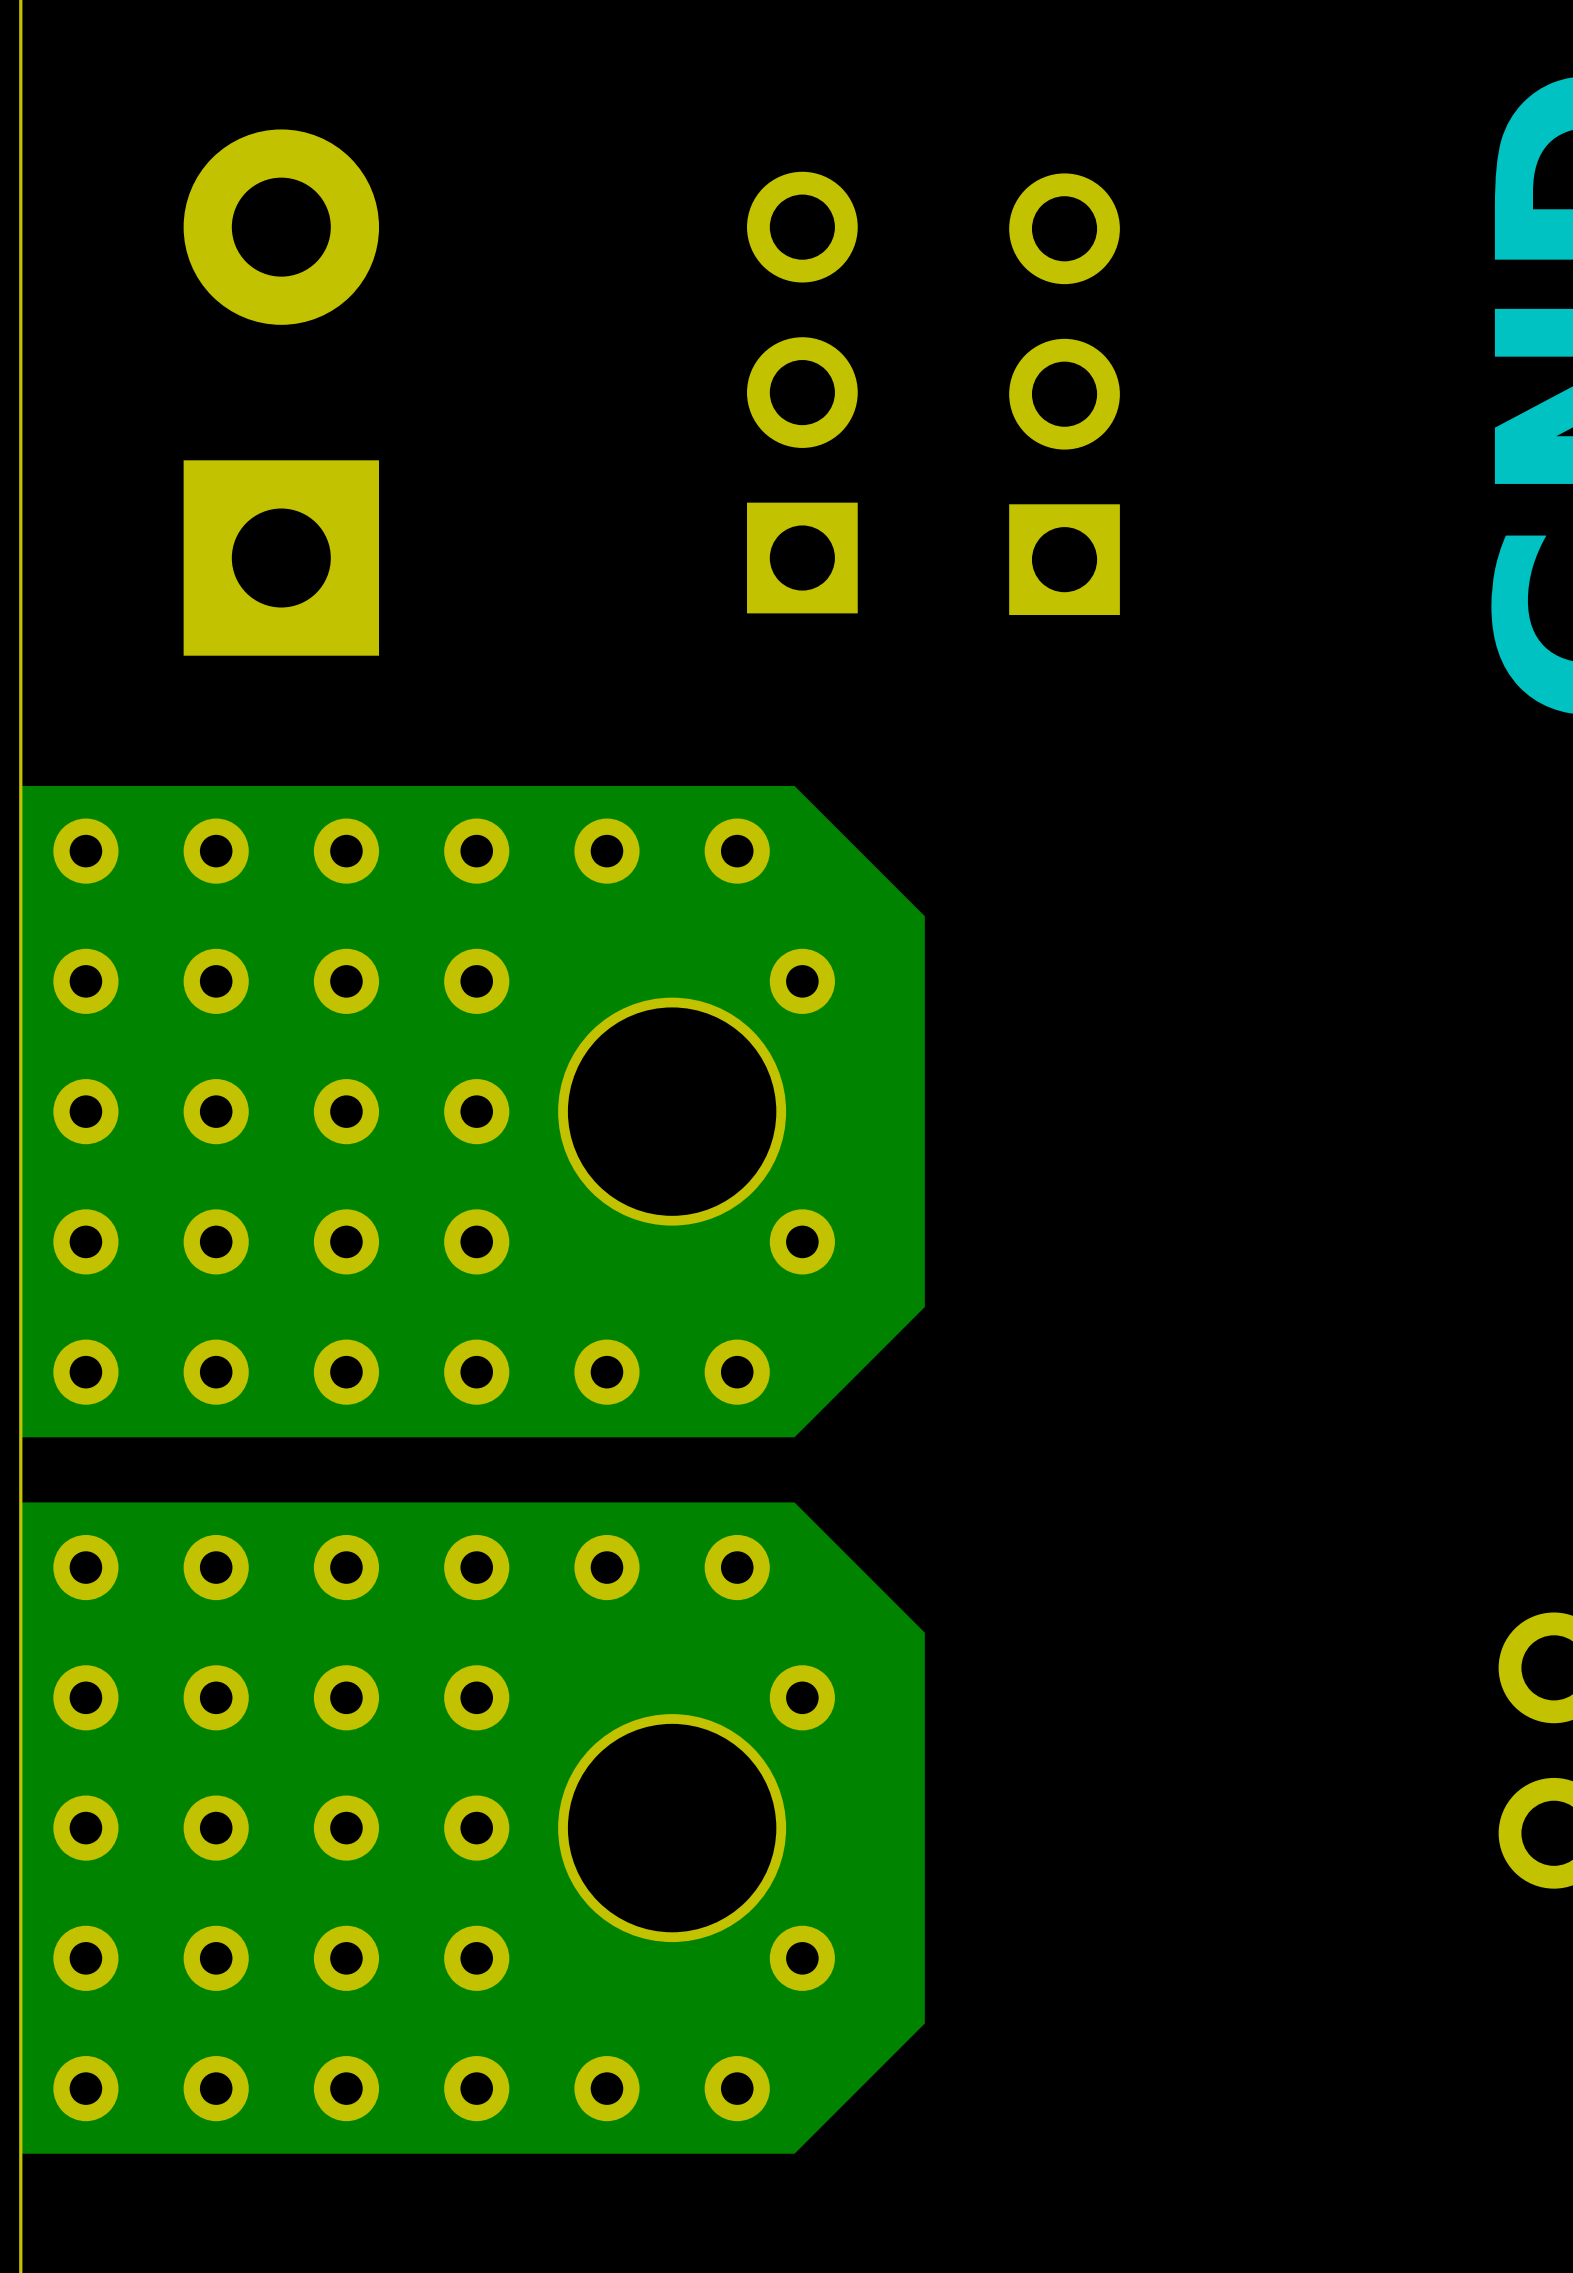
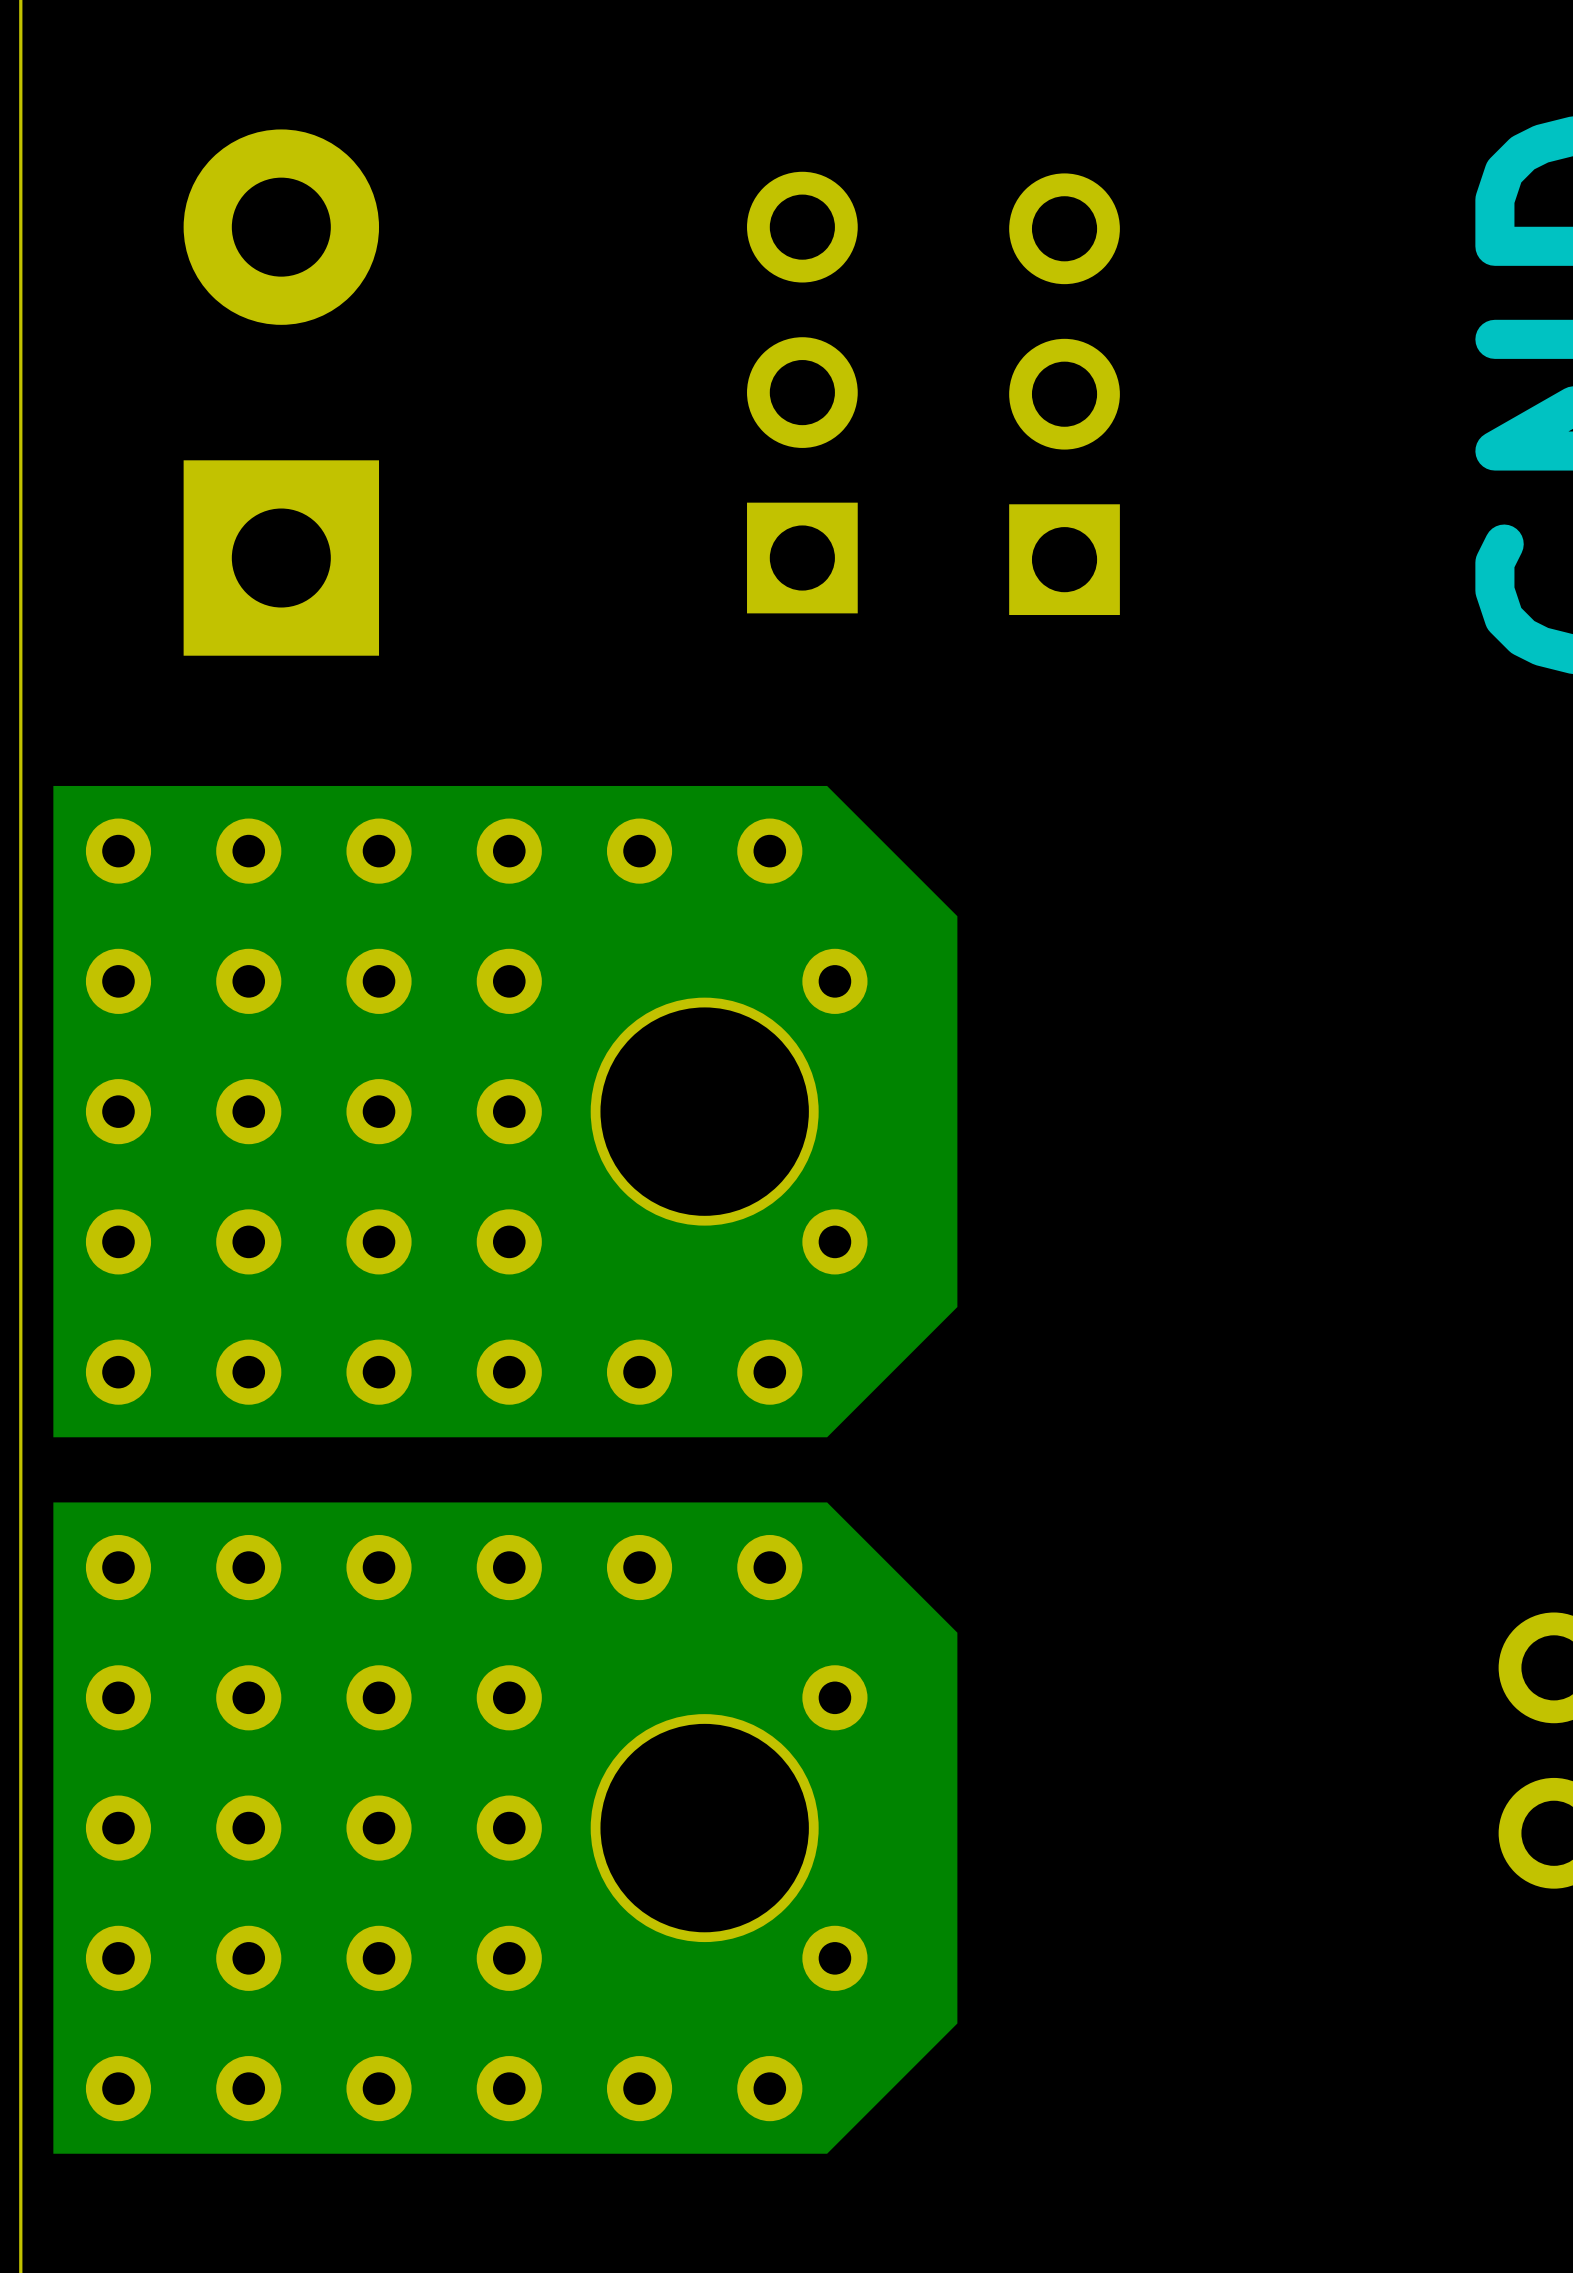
part position: (472, 1111) -> (505, 1111)
part position: (472, 1828) -> (505, 1828)

